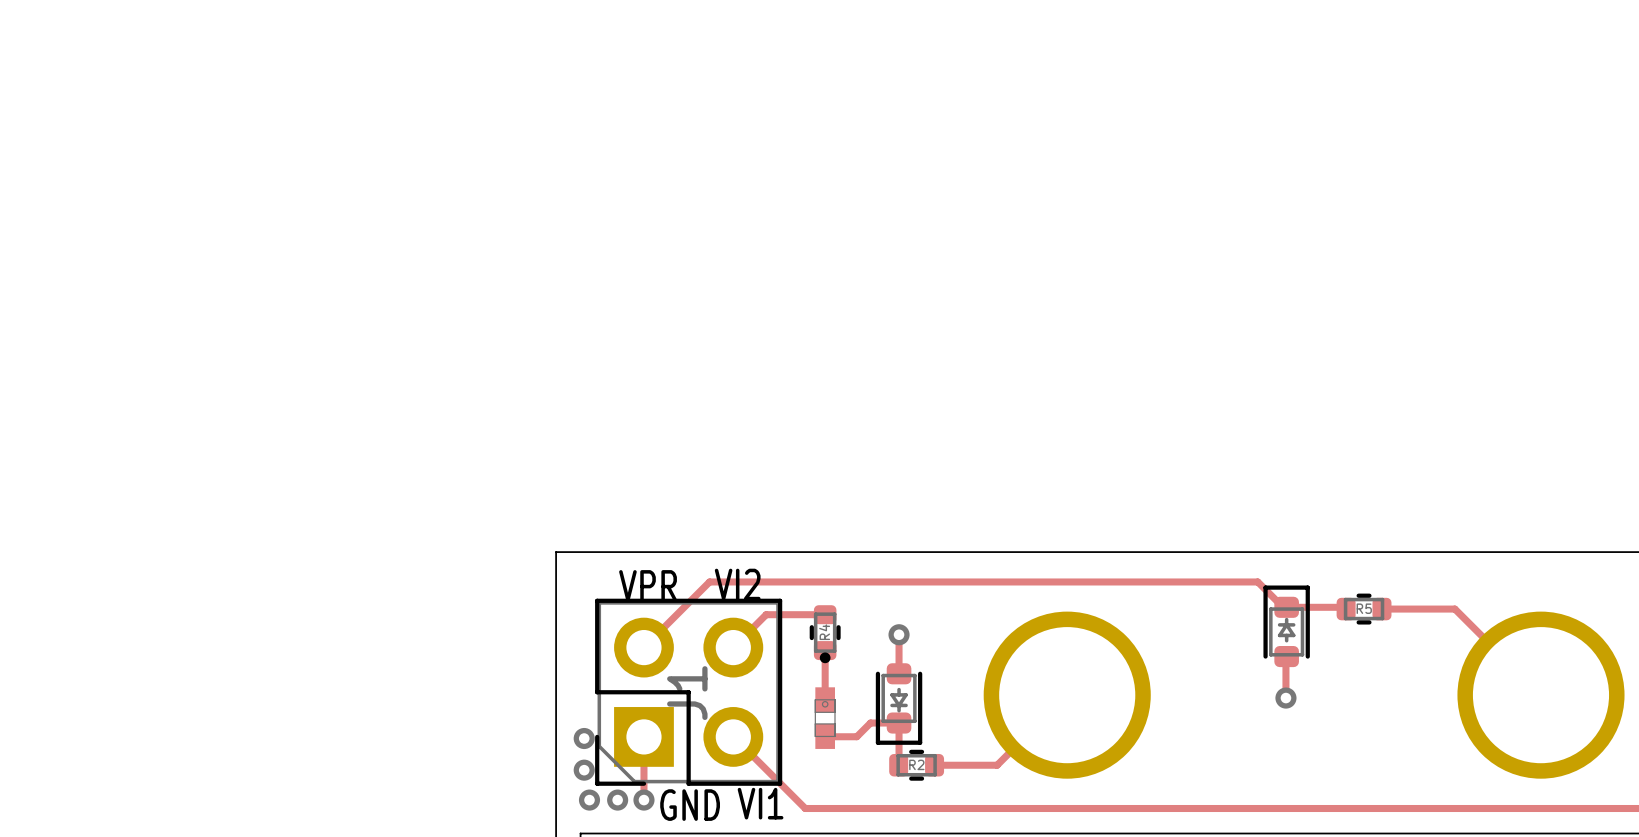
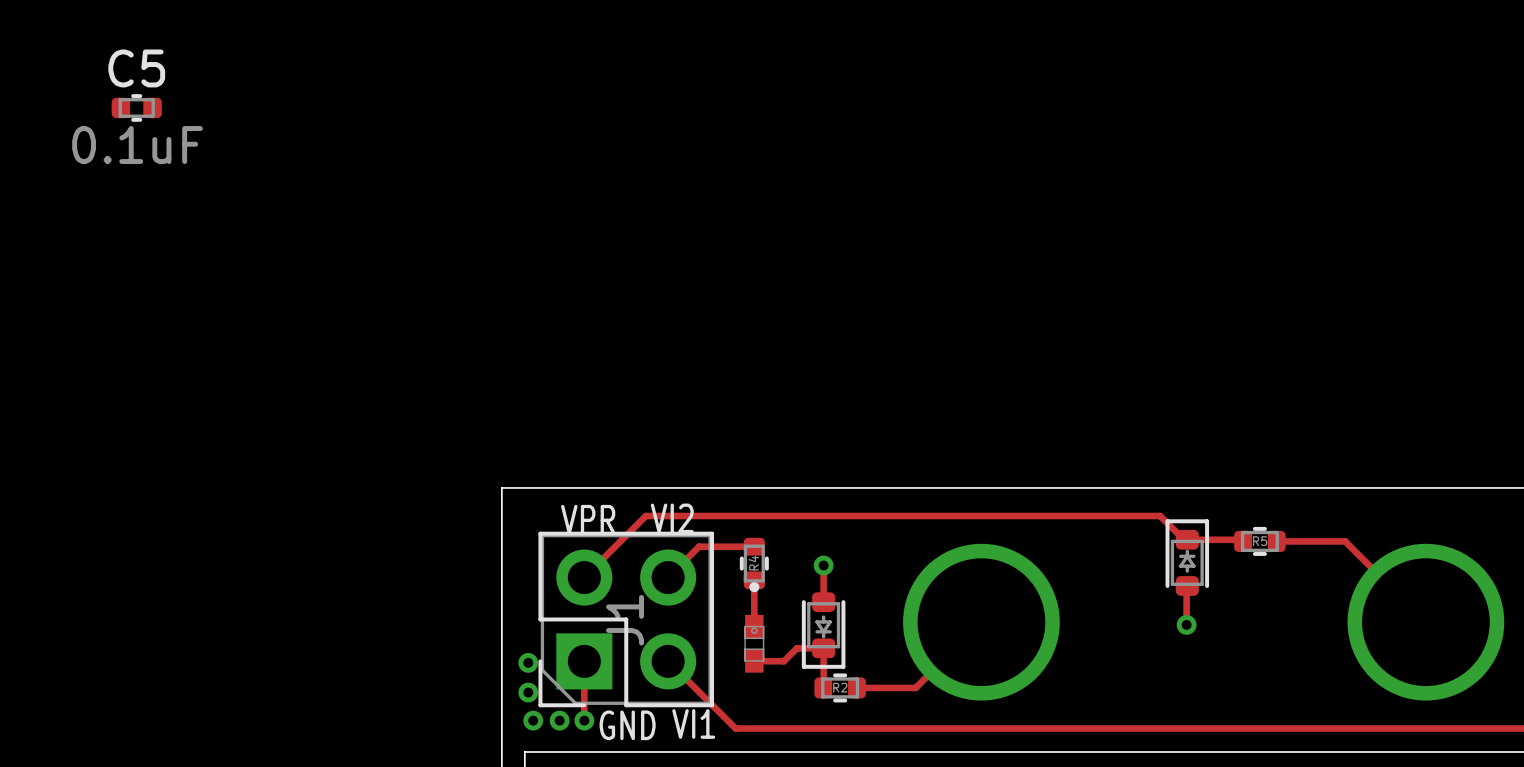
C5: none -> 0.1uF (136, 107)

